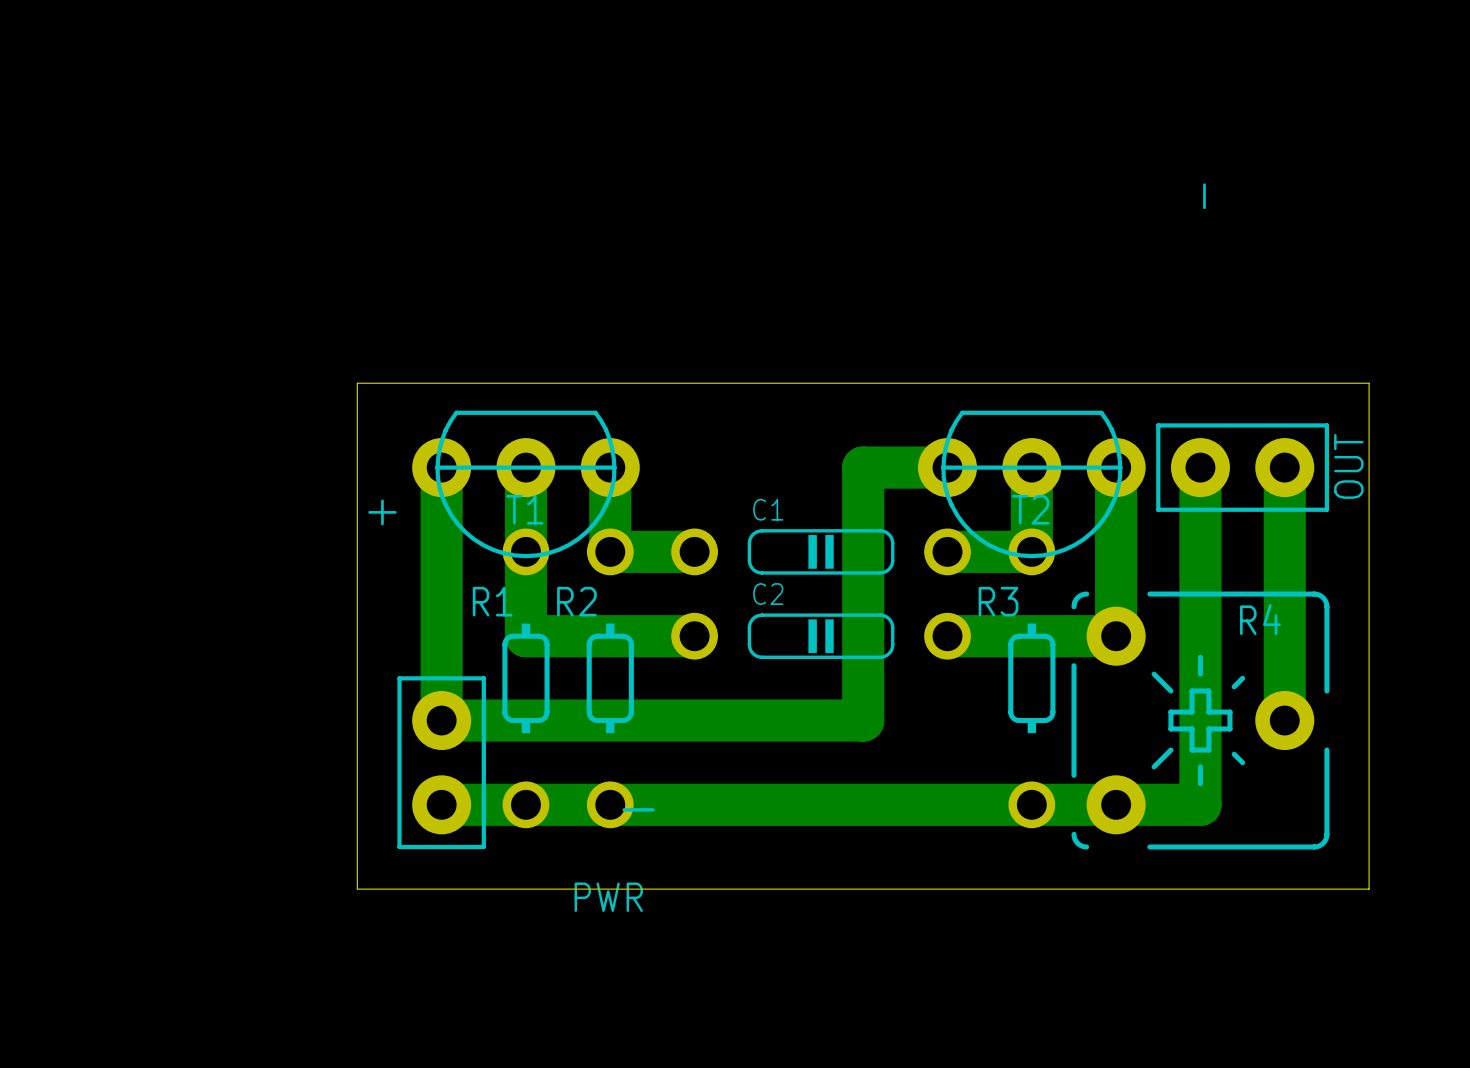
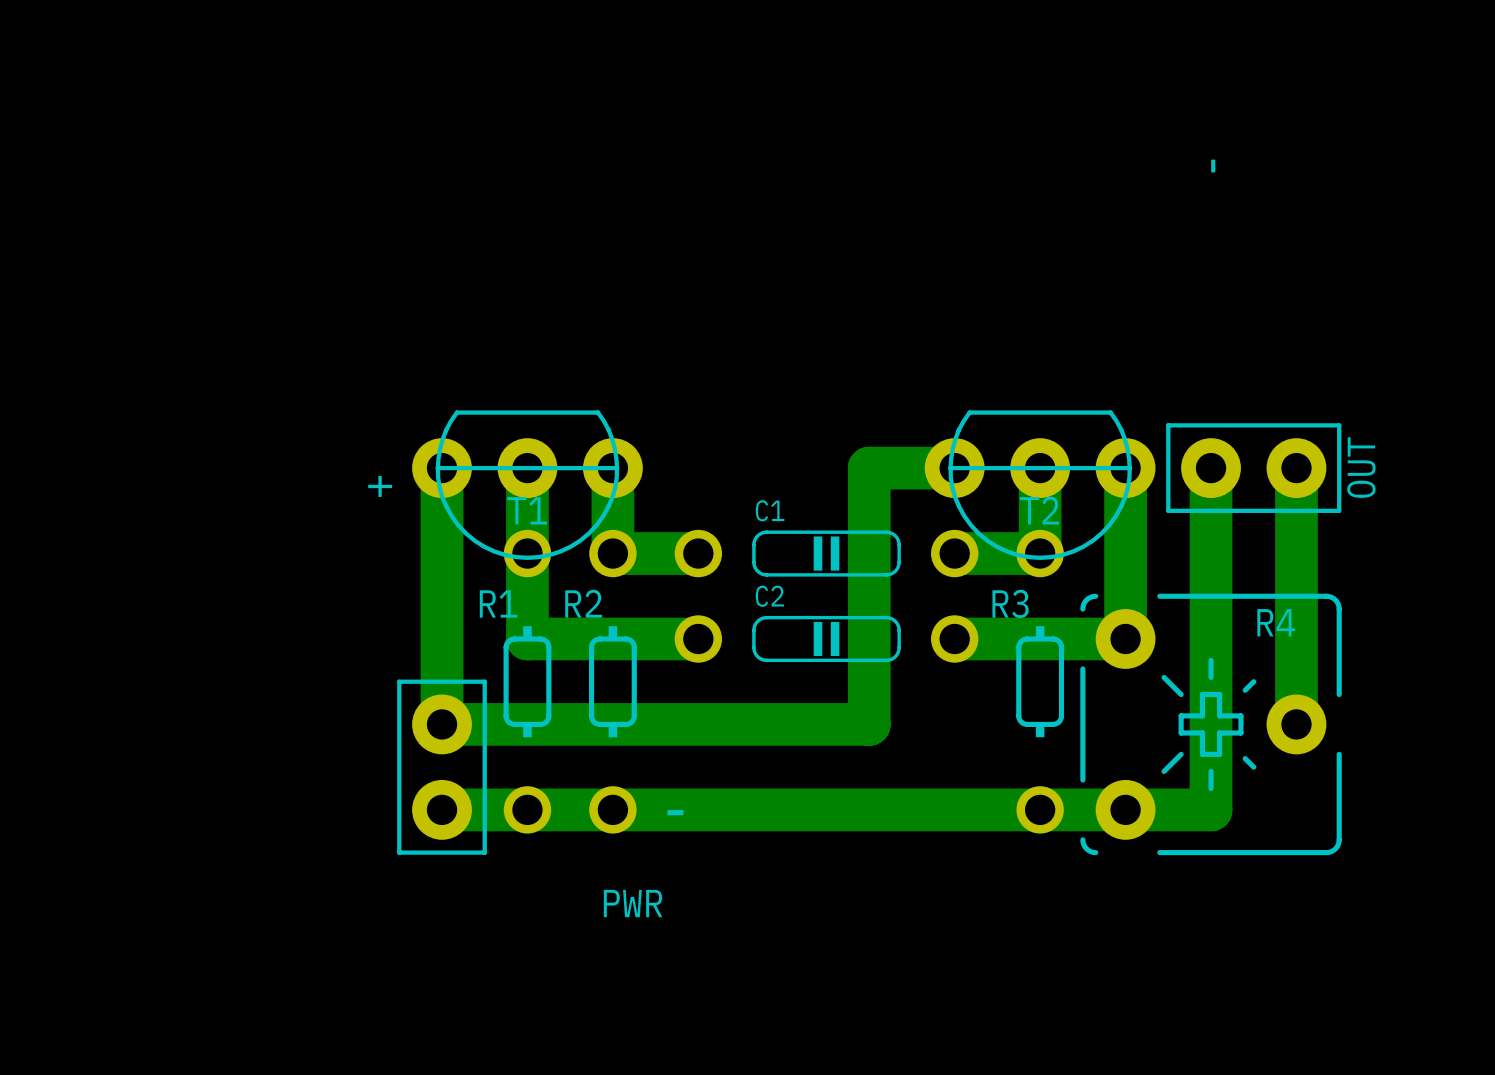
board edge: (357, 383) (1369, 383) (1369, 889) (357, 889) (357, 383) -> none

